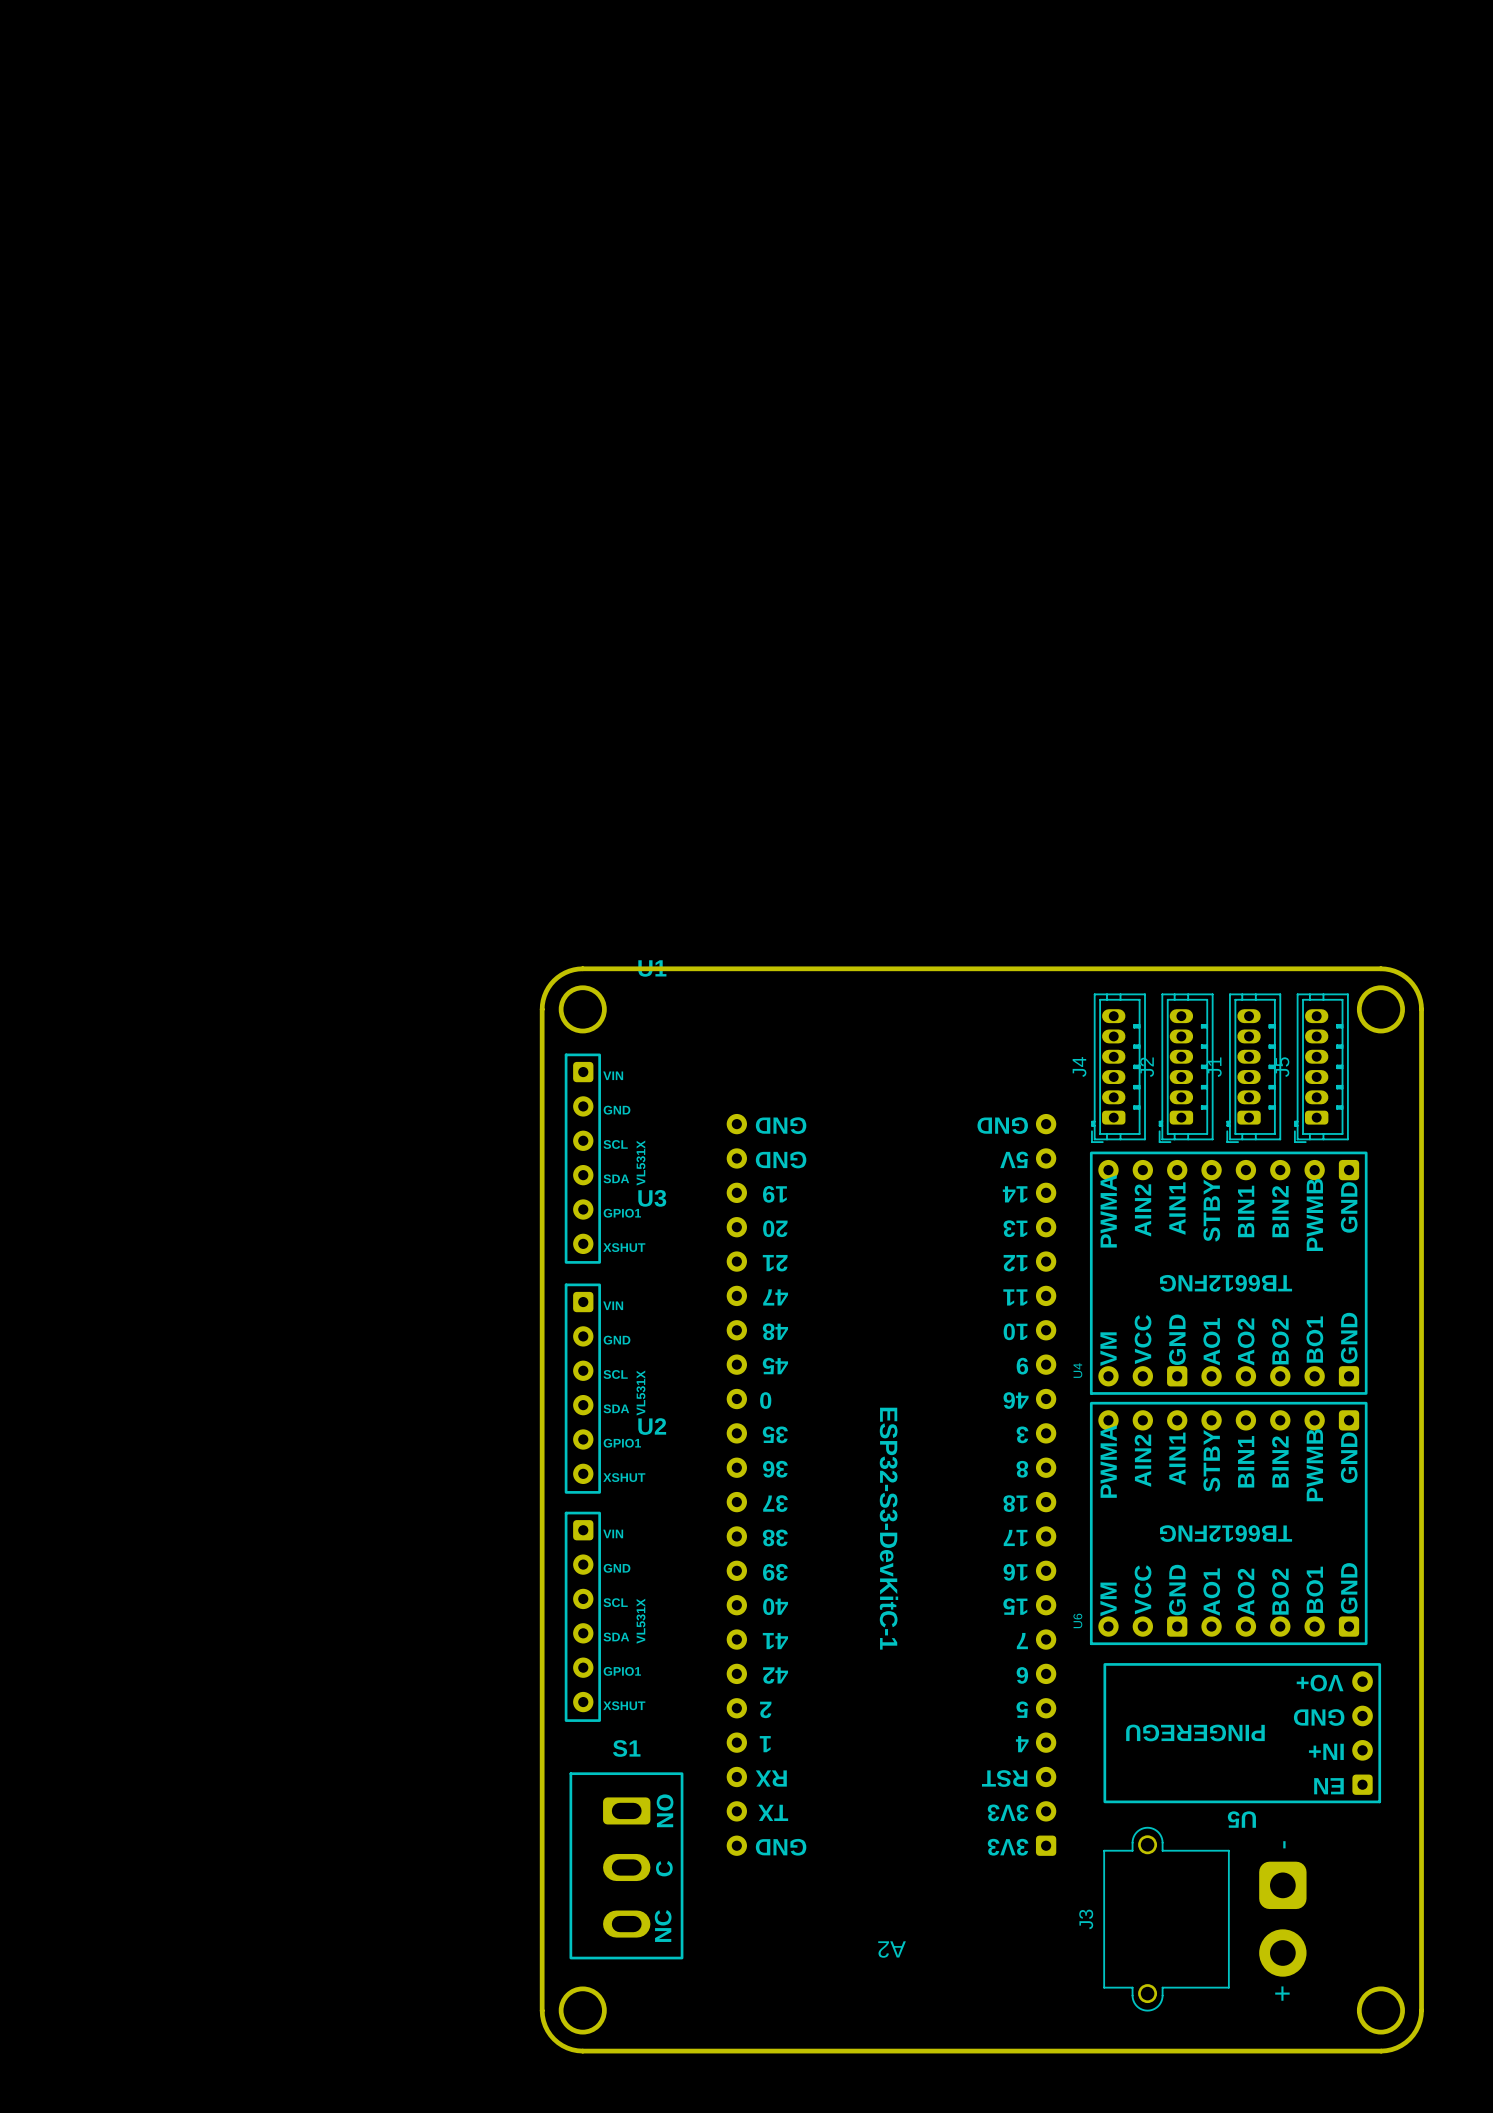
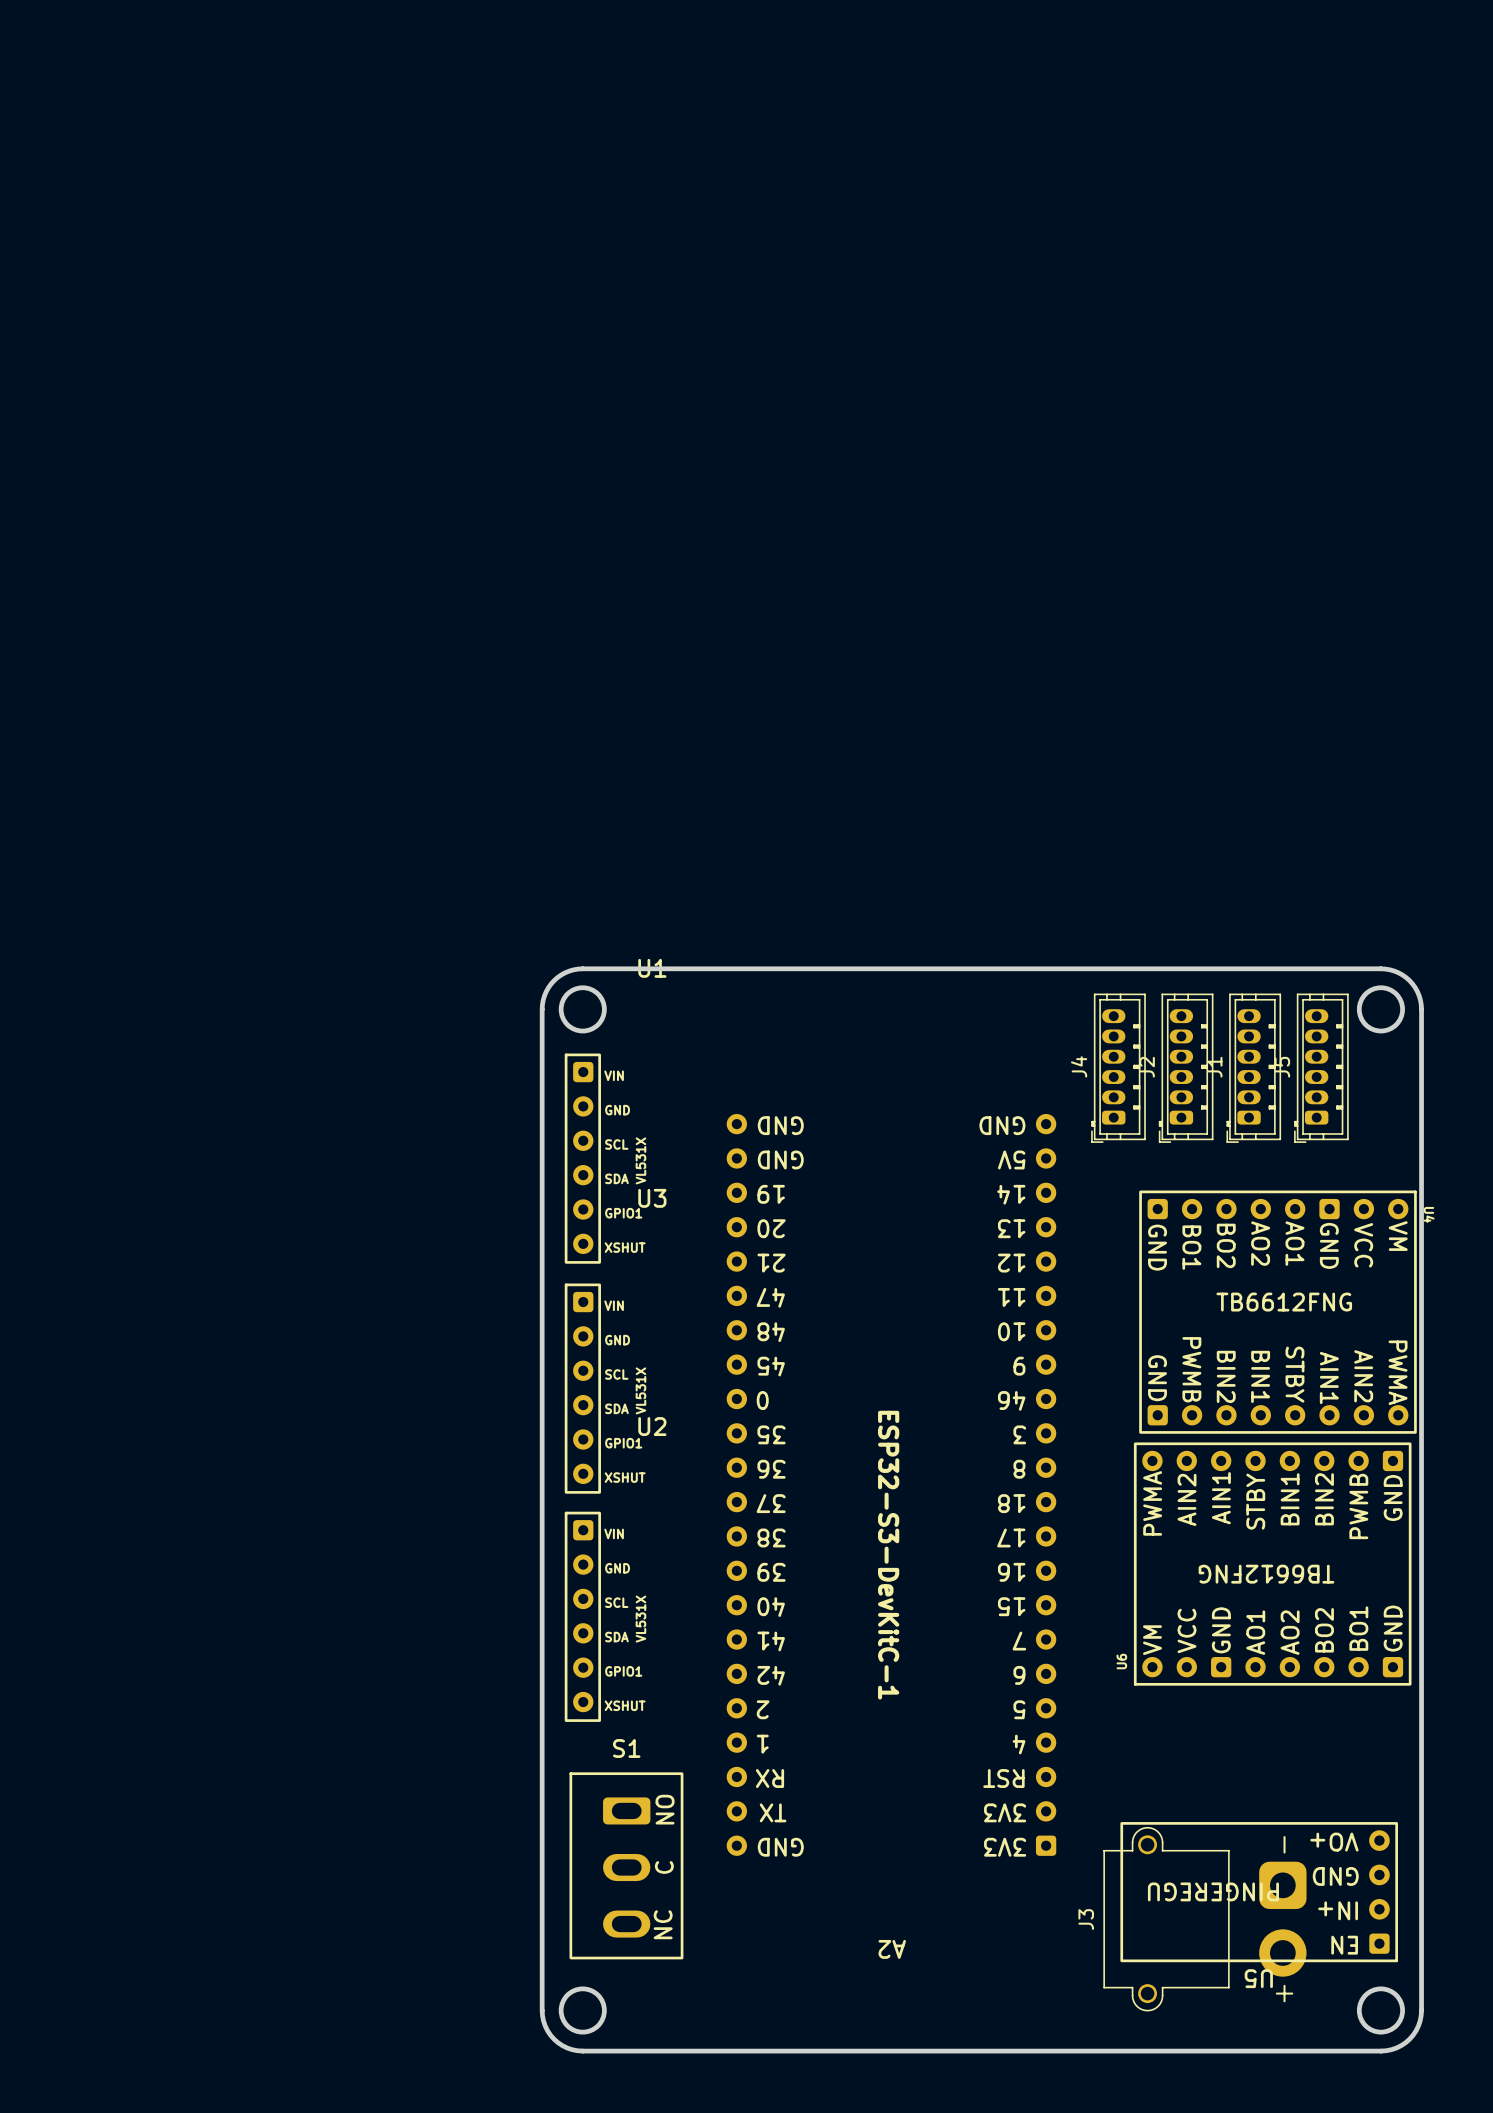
U4 rotation: 0° (1228, 1273) -> 180° (1277, 1312)
U6 position: (1228, 1523) -> (1272, 1564)
U5 position: (1242, 1733) -> (1259, 1892)

